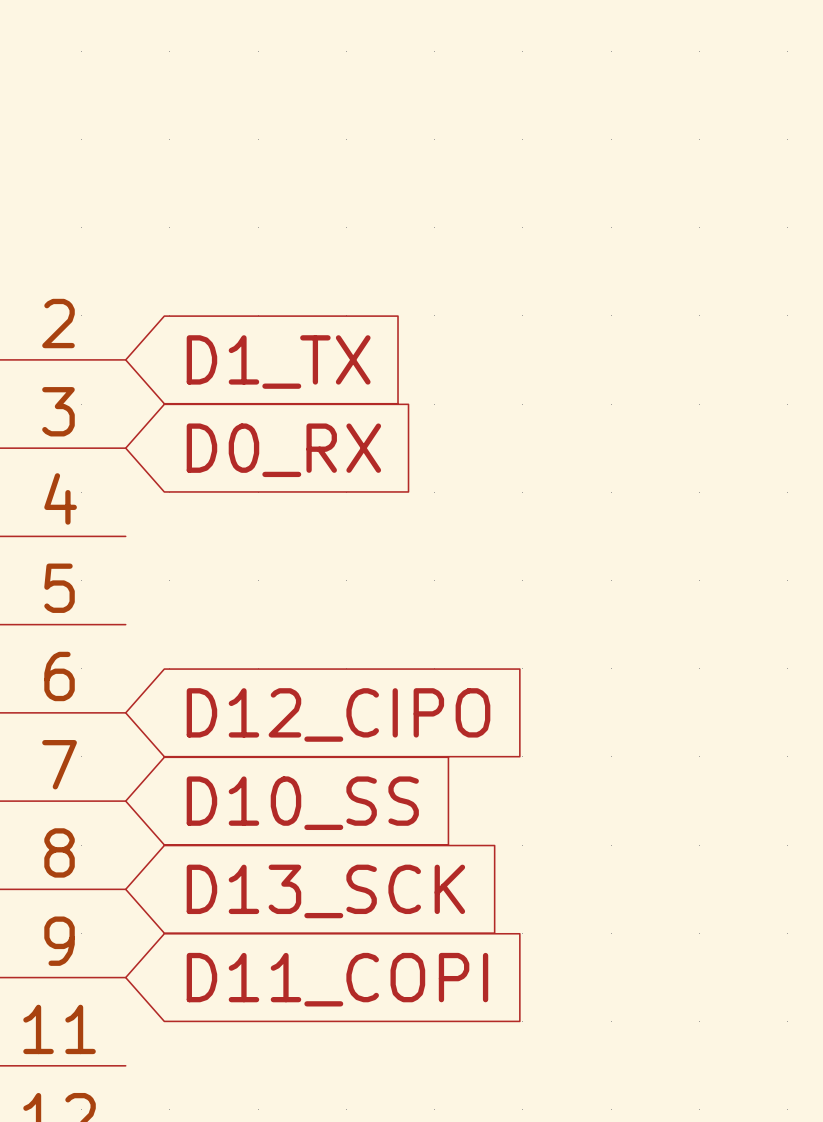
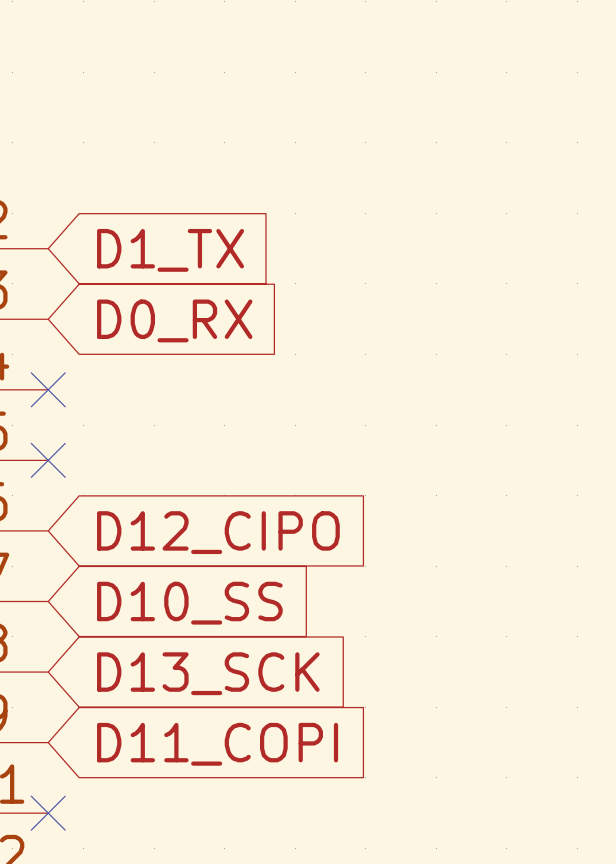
no-connect mark: none -> (48, 389)
no-connect mark: none -> (48, 460)
no-connect mark: none -> (48, 813)

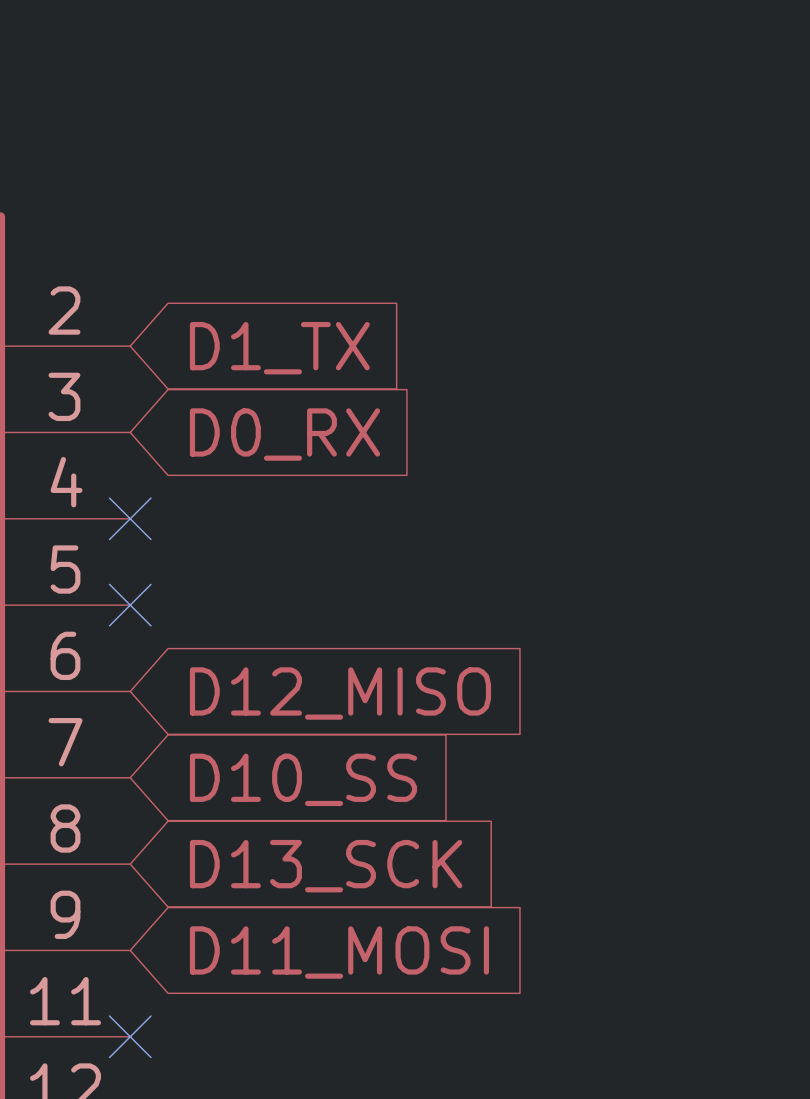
global label: D12_CIPO (218, 532) -> D12_MISO (340, 693)
global label: D11_COPI (217, 744) -> D11_MOSI (339, 952)

